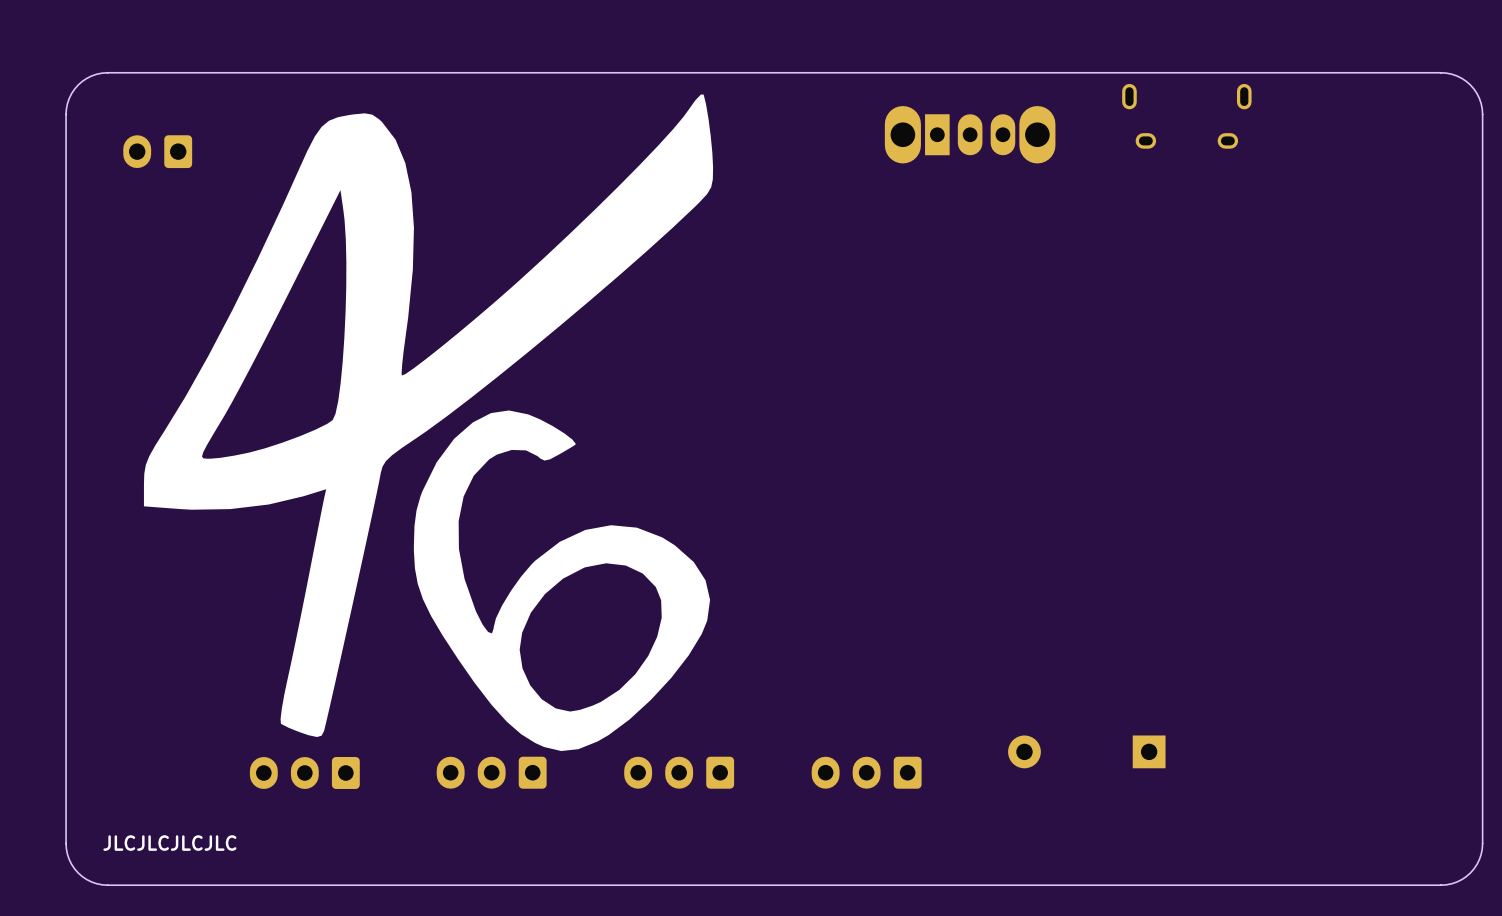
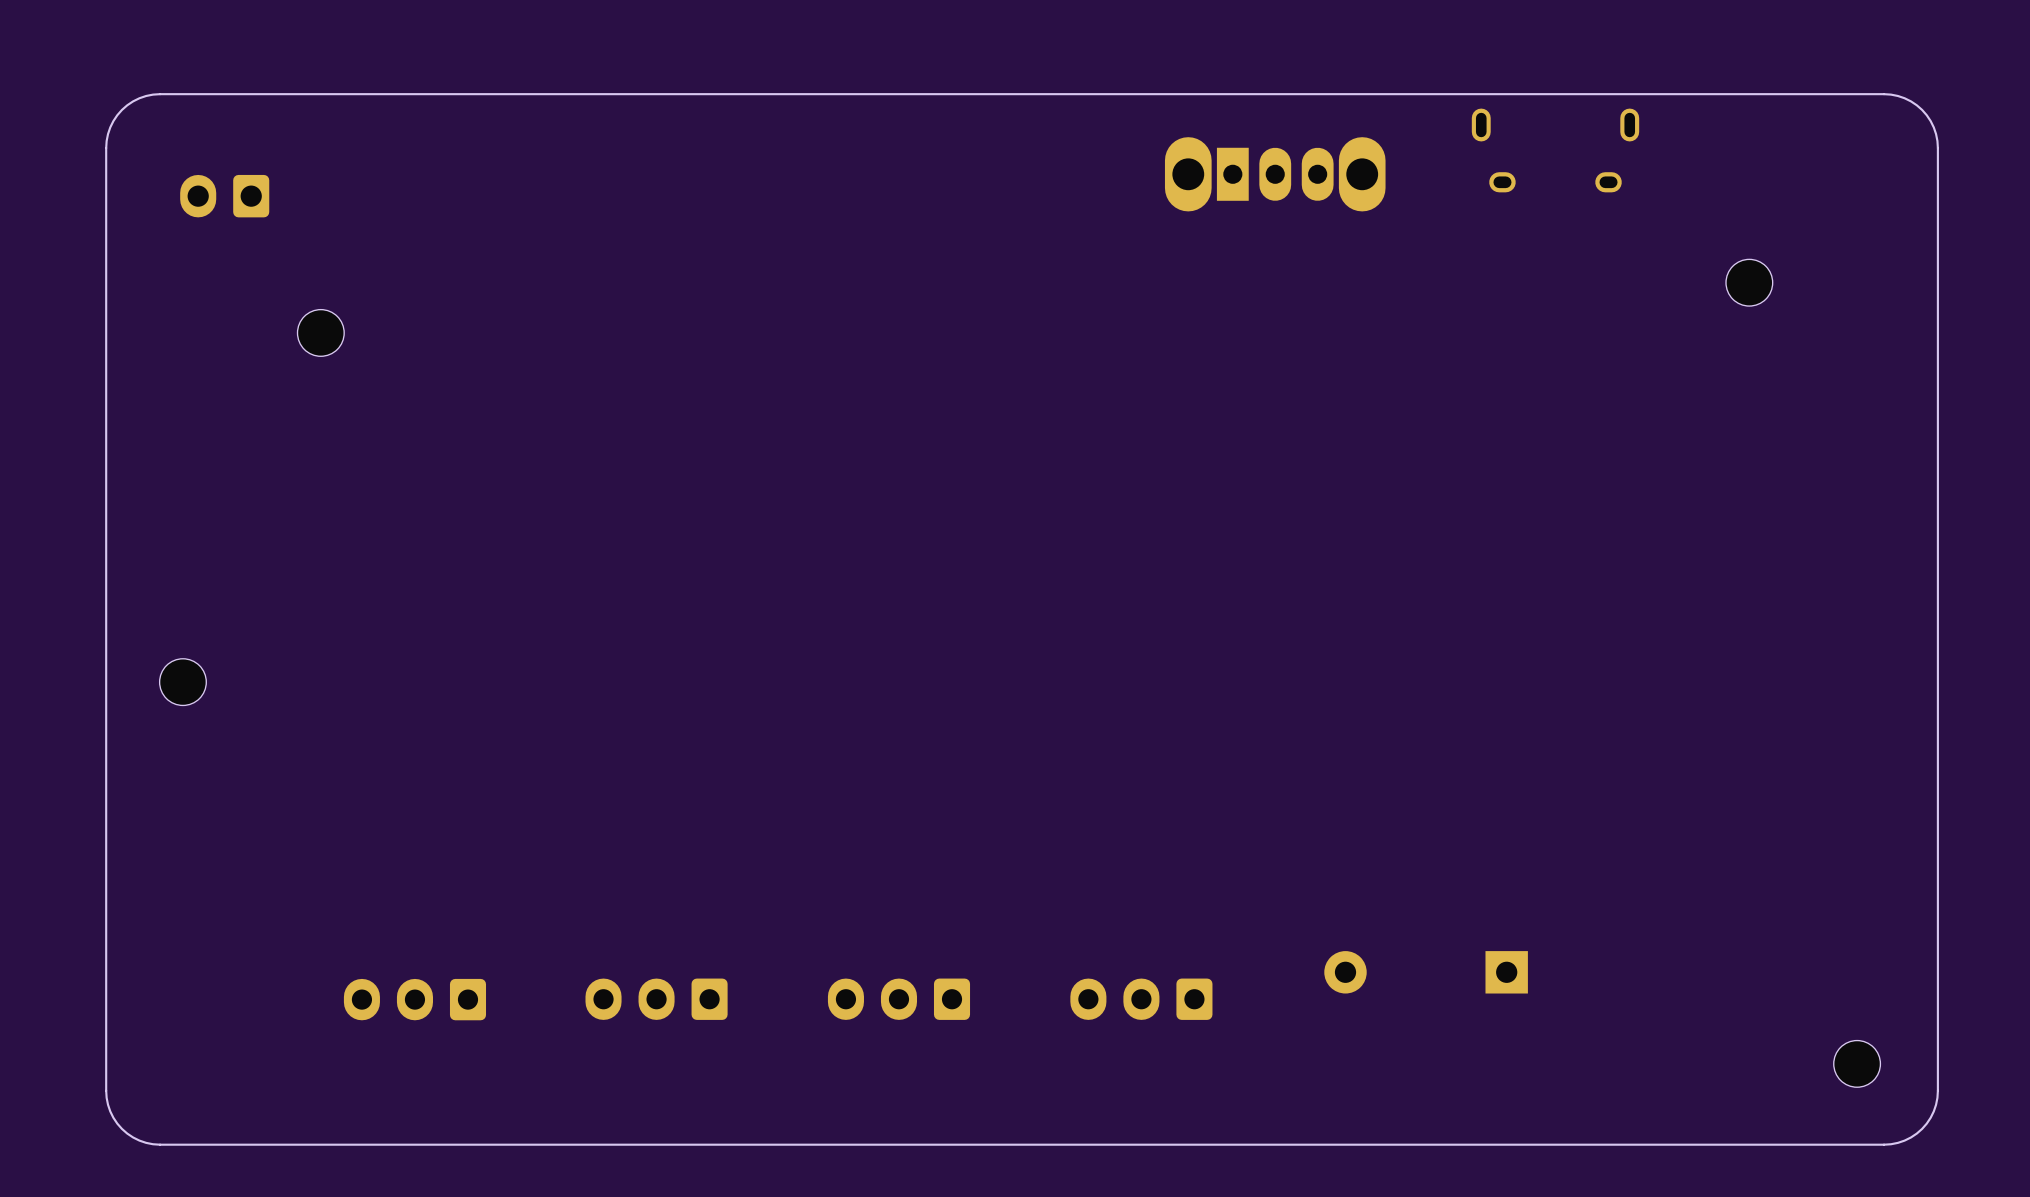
drawing: [143, 94, 714, 752] -> none
part: none -> (1749, 282)
part: none -> (320, 332)
part: none -> (182, 682)
part: none -> (1857, 1063)
text: JLCJLCJLCJLC (169, 843) -> none

